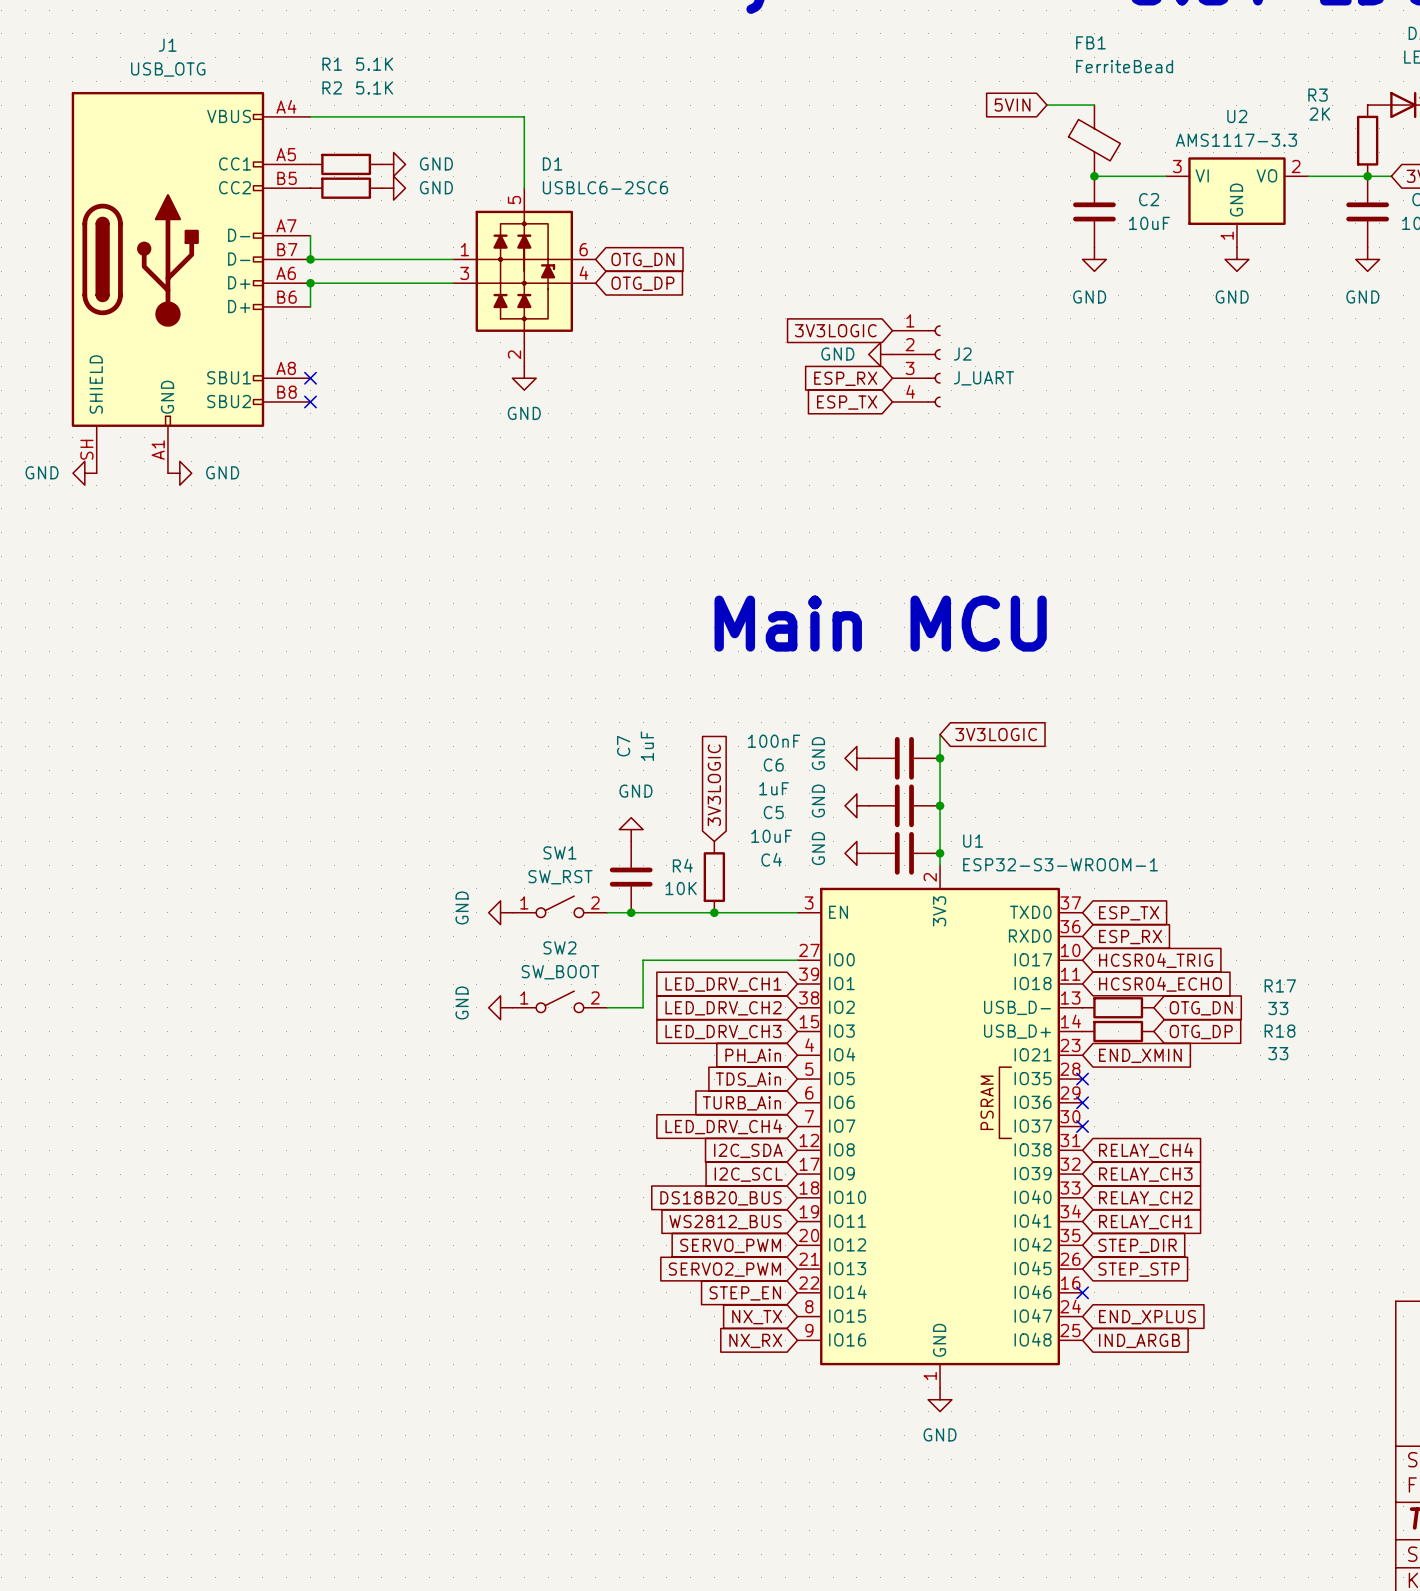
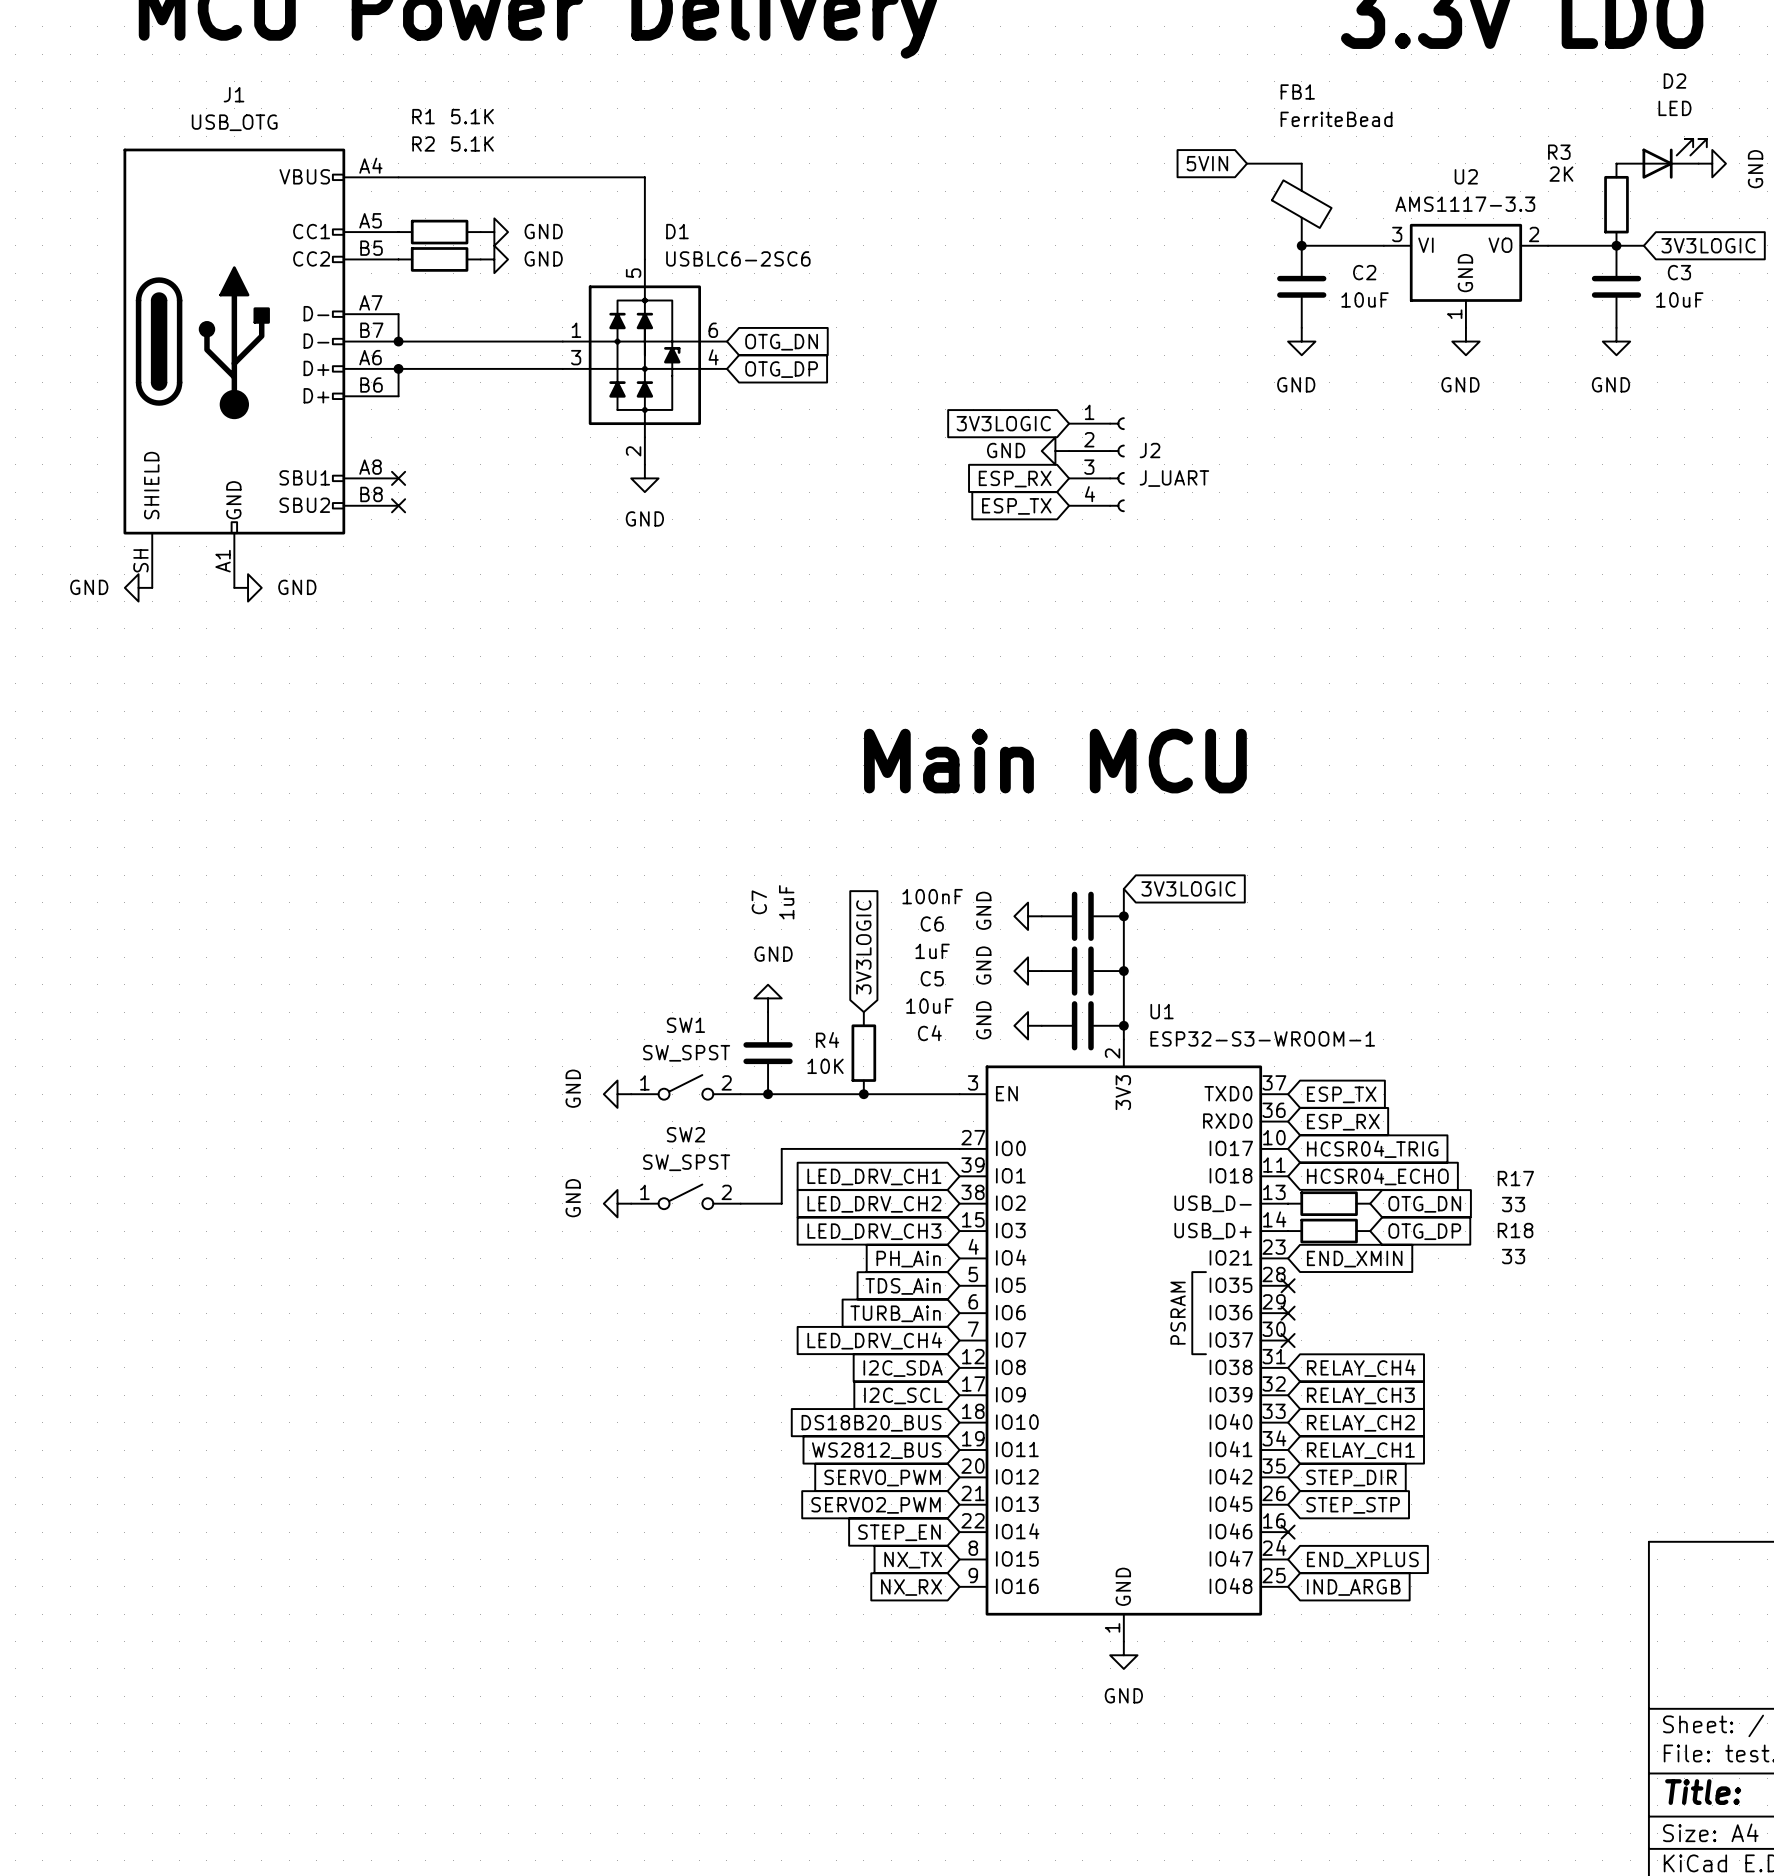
SW1 value: SW_RST (560, 877) -> SW_SPST (686, 1053)
SW2 value: SW_BOOT (560, 972) -> SW_SPST (686, 1162)

